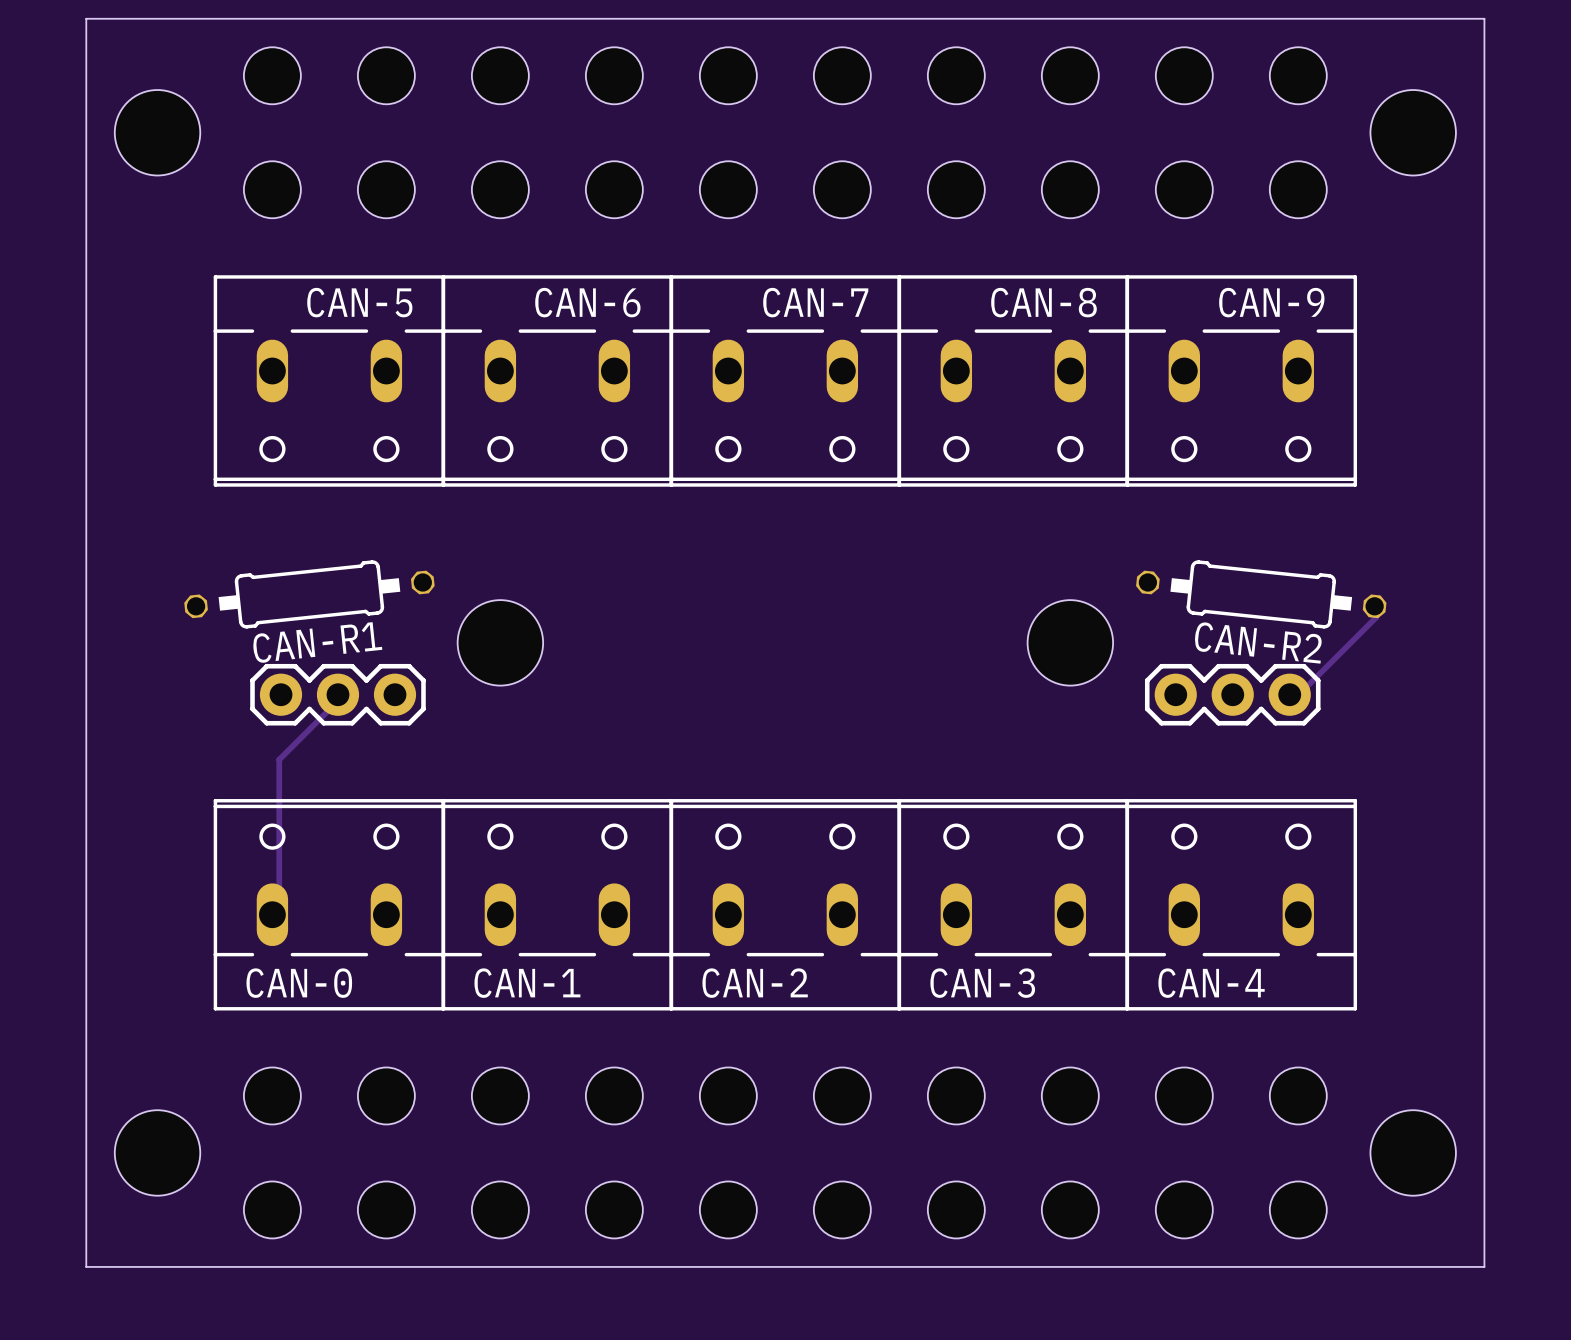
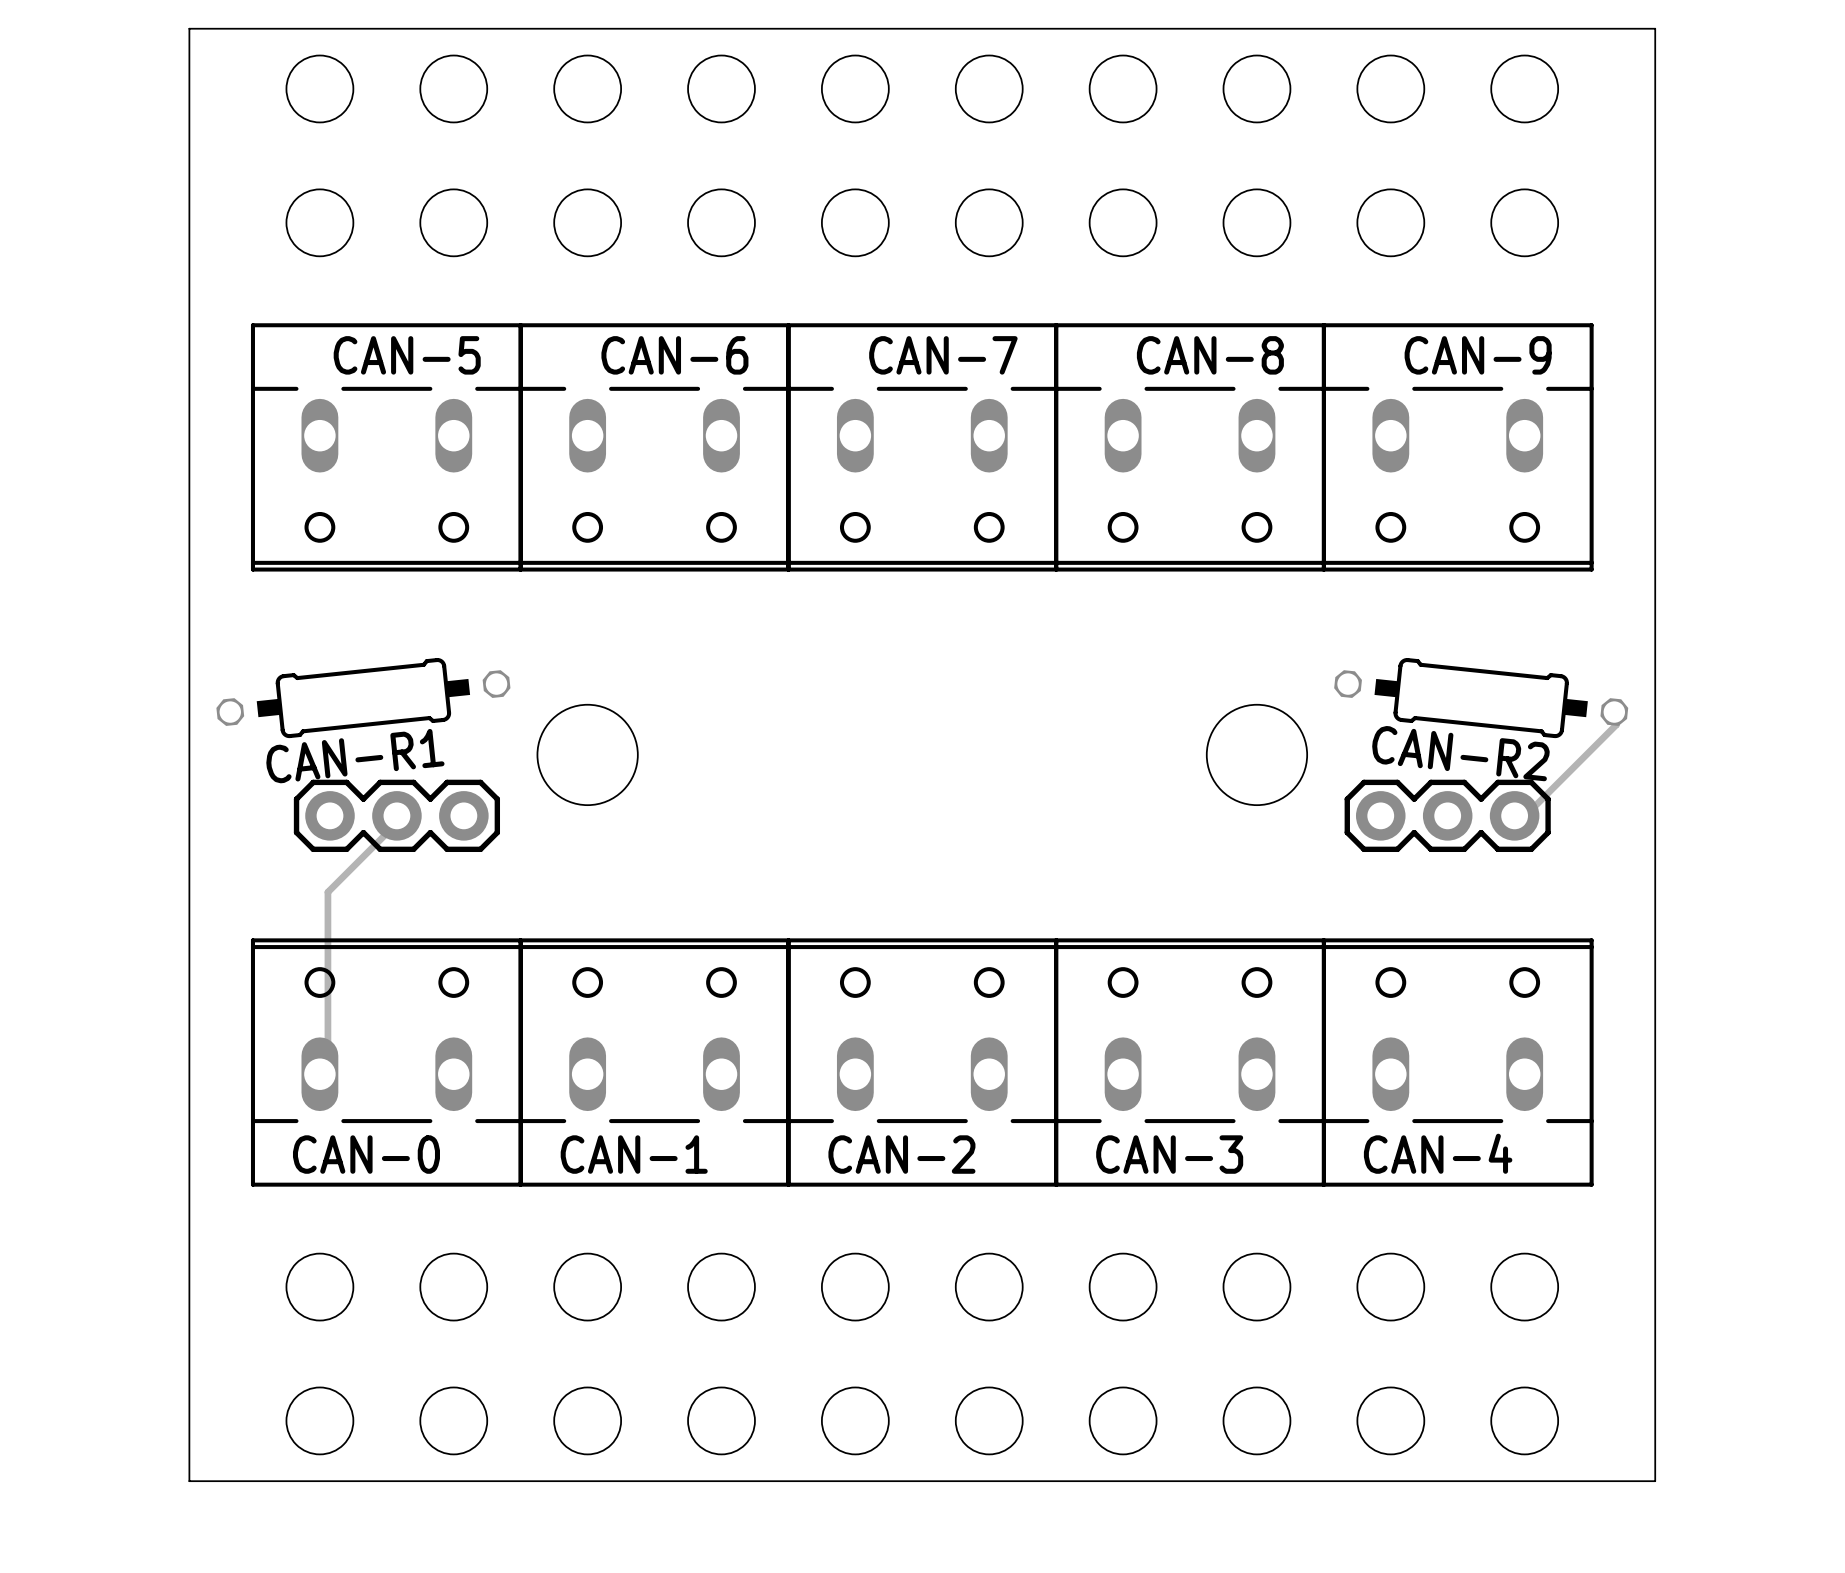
board edge: (86, 18) (1484, 18) (1484, 1266) (86, 1266) (86, 18) -> (189, 28) (189, 1481) (1655, 1481) (1655, 28) (189, 28)
hole: (157, 132) -> none
hole: (1413, 132) -> none
hole: (157, 1152) -> none
hole: (1413, 1152) -> none

